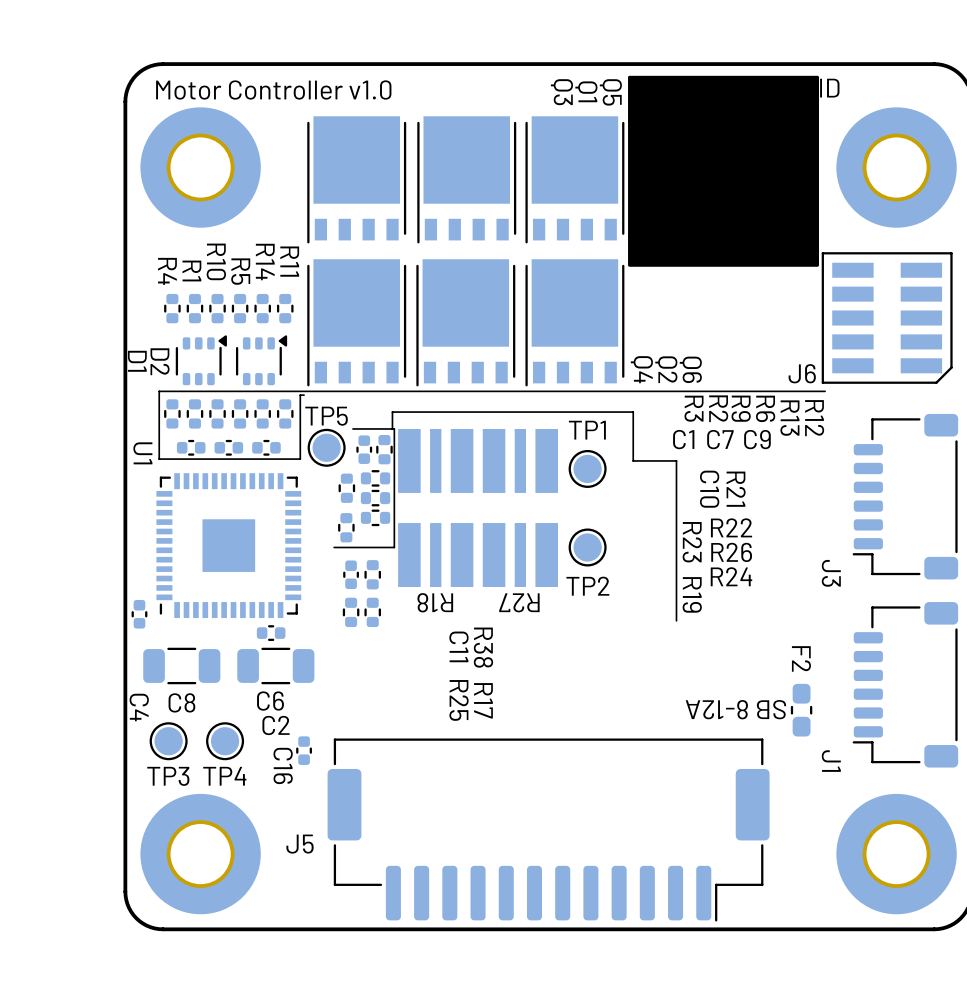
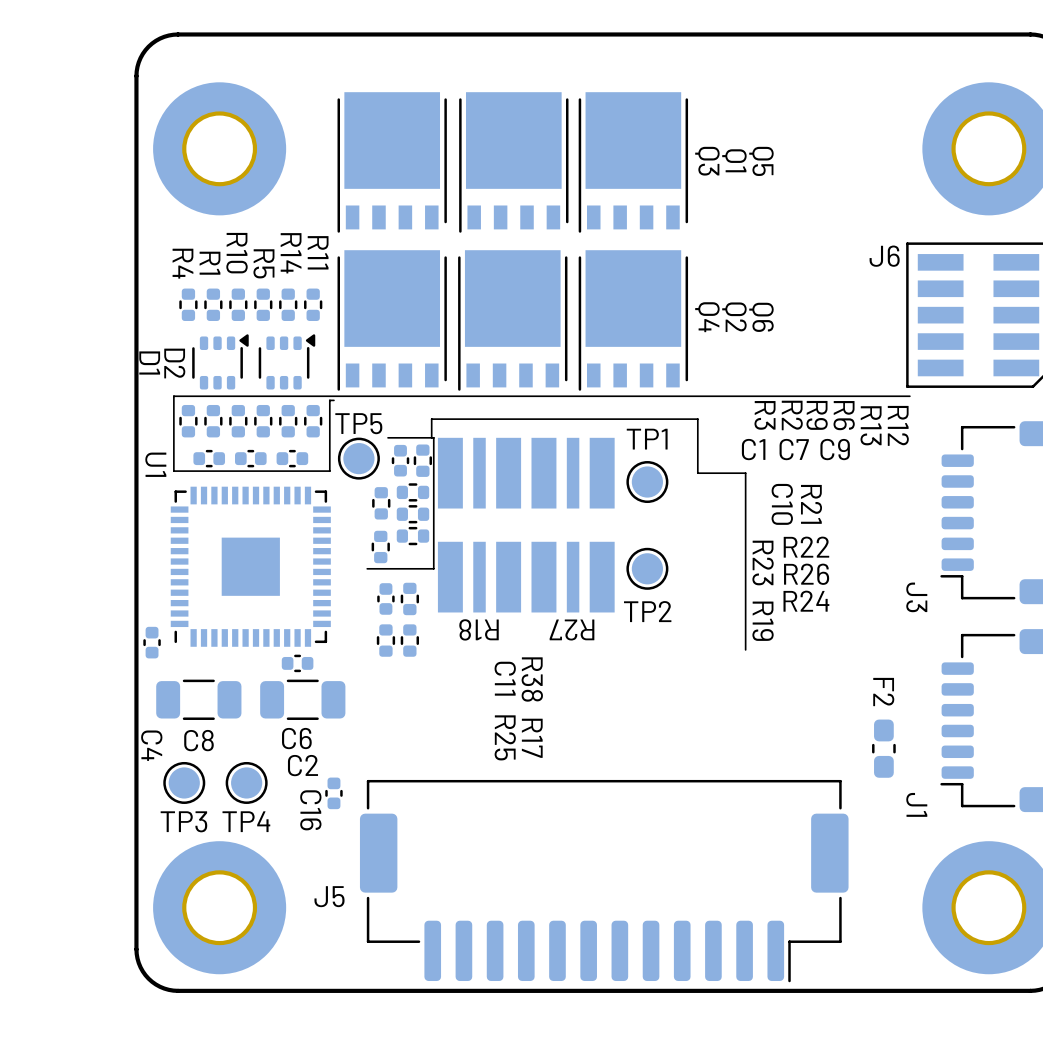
drawing: [628, 75, 820, 267] -> none
text: ID (829, 88) -> none
text: Motor Controller v1.0 (273, 90) -> none
Q1 name position: Q1 (586, 91) -> Q1 (734, 160)
Q3 name position: Q3 (561, 92) -> Q3 (707, 161)
Q5 name position: Q5 (610, 92) -> Q5 (761, 161)
Q4 name position: Q4 (641, 369) -> Q4 (707, 317)
Q2 name position: Q2 (666, 369) -> Q2 (734, 317)
Q6 name position: Q6 (690, 369) -> Q6 (761, 317)
J6 name position: J6 (802, 373) -> J6 (884, 256)
text: SB 8-12A (735, 709) -> none

